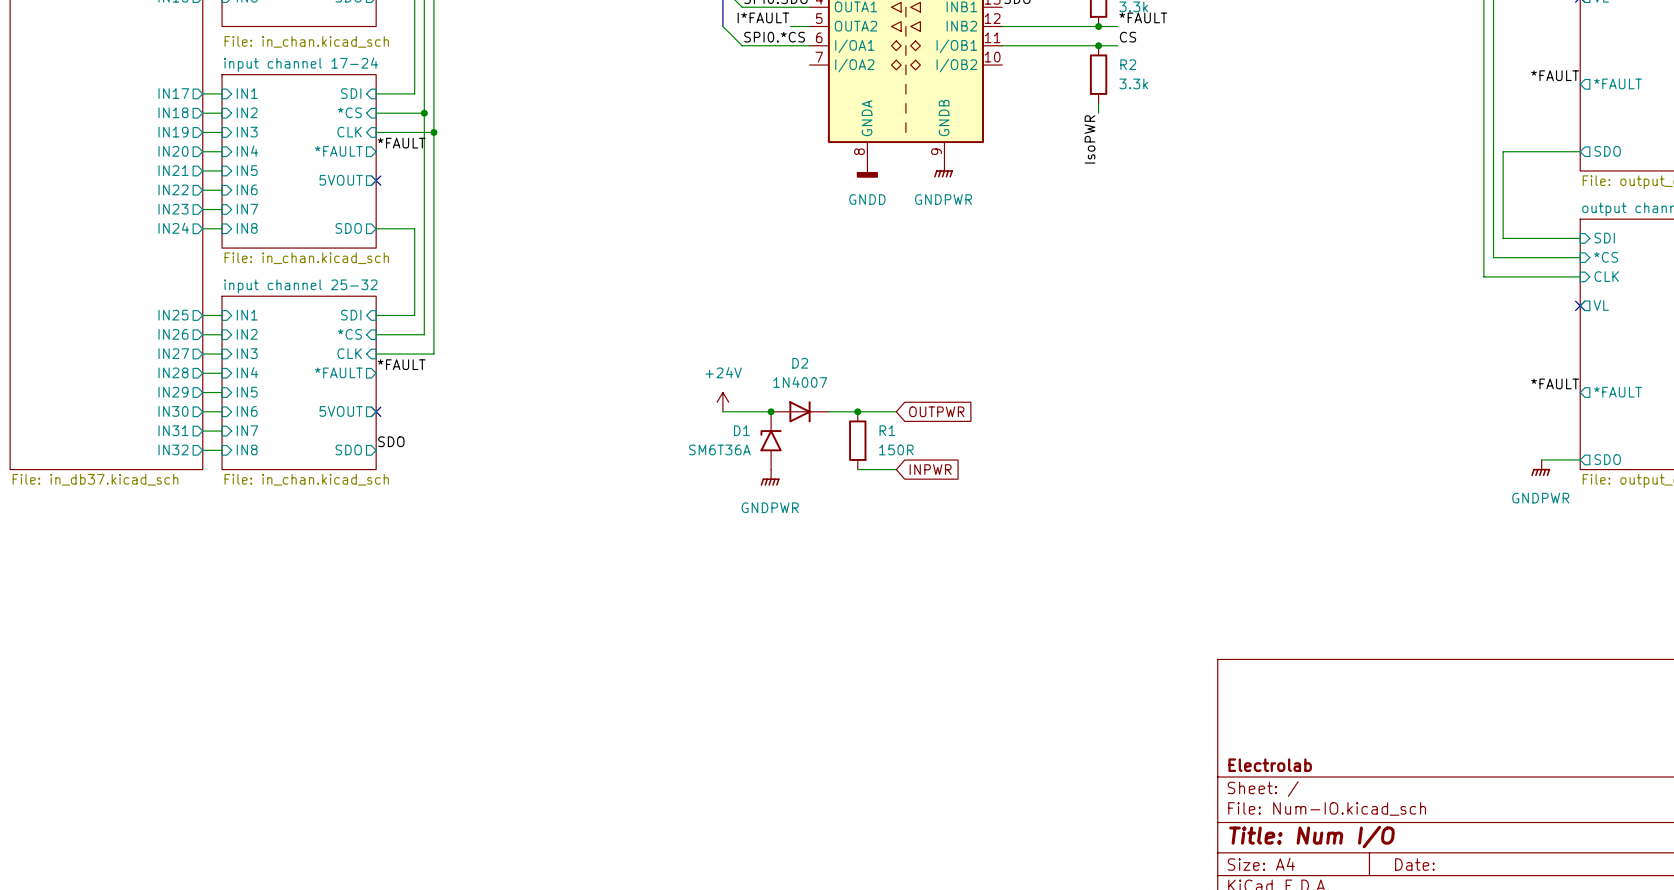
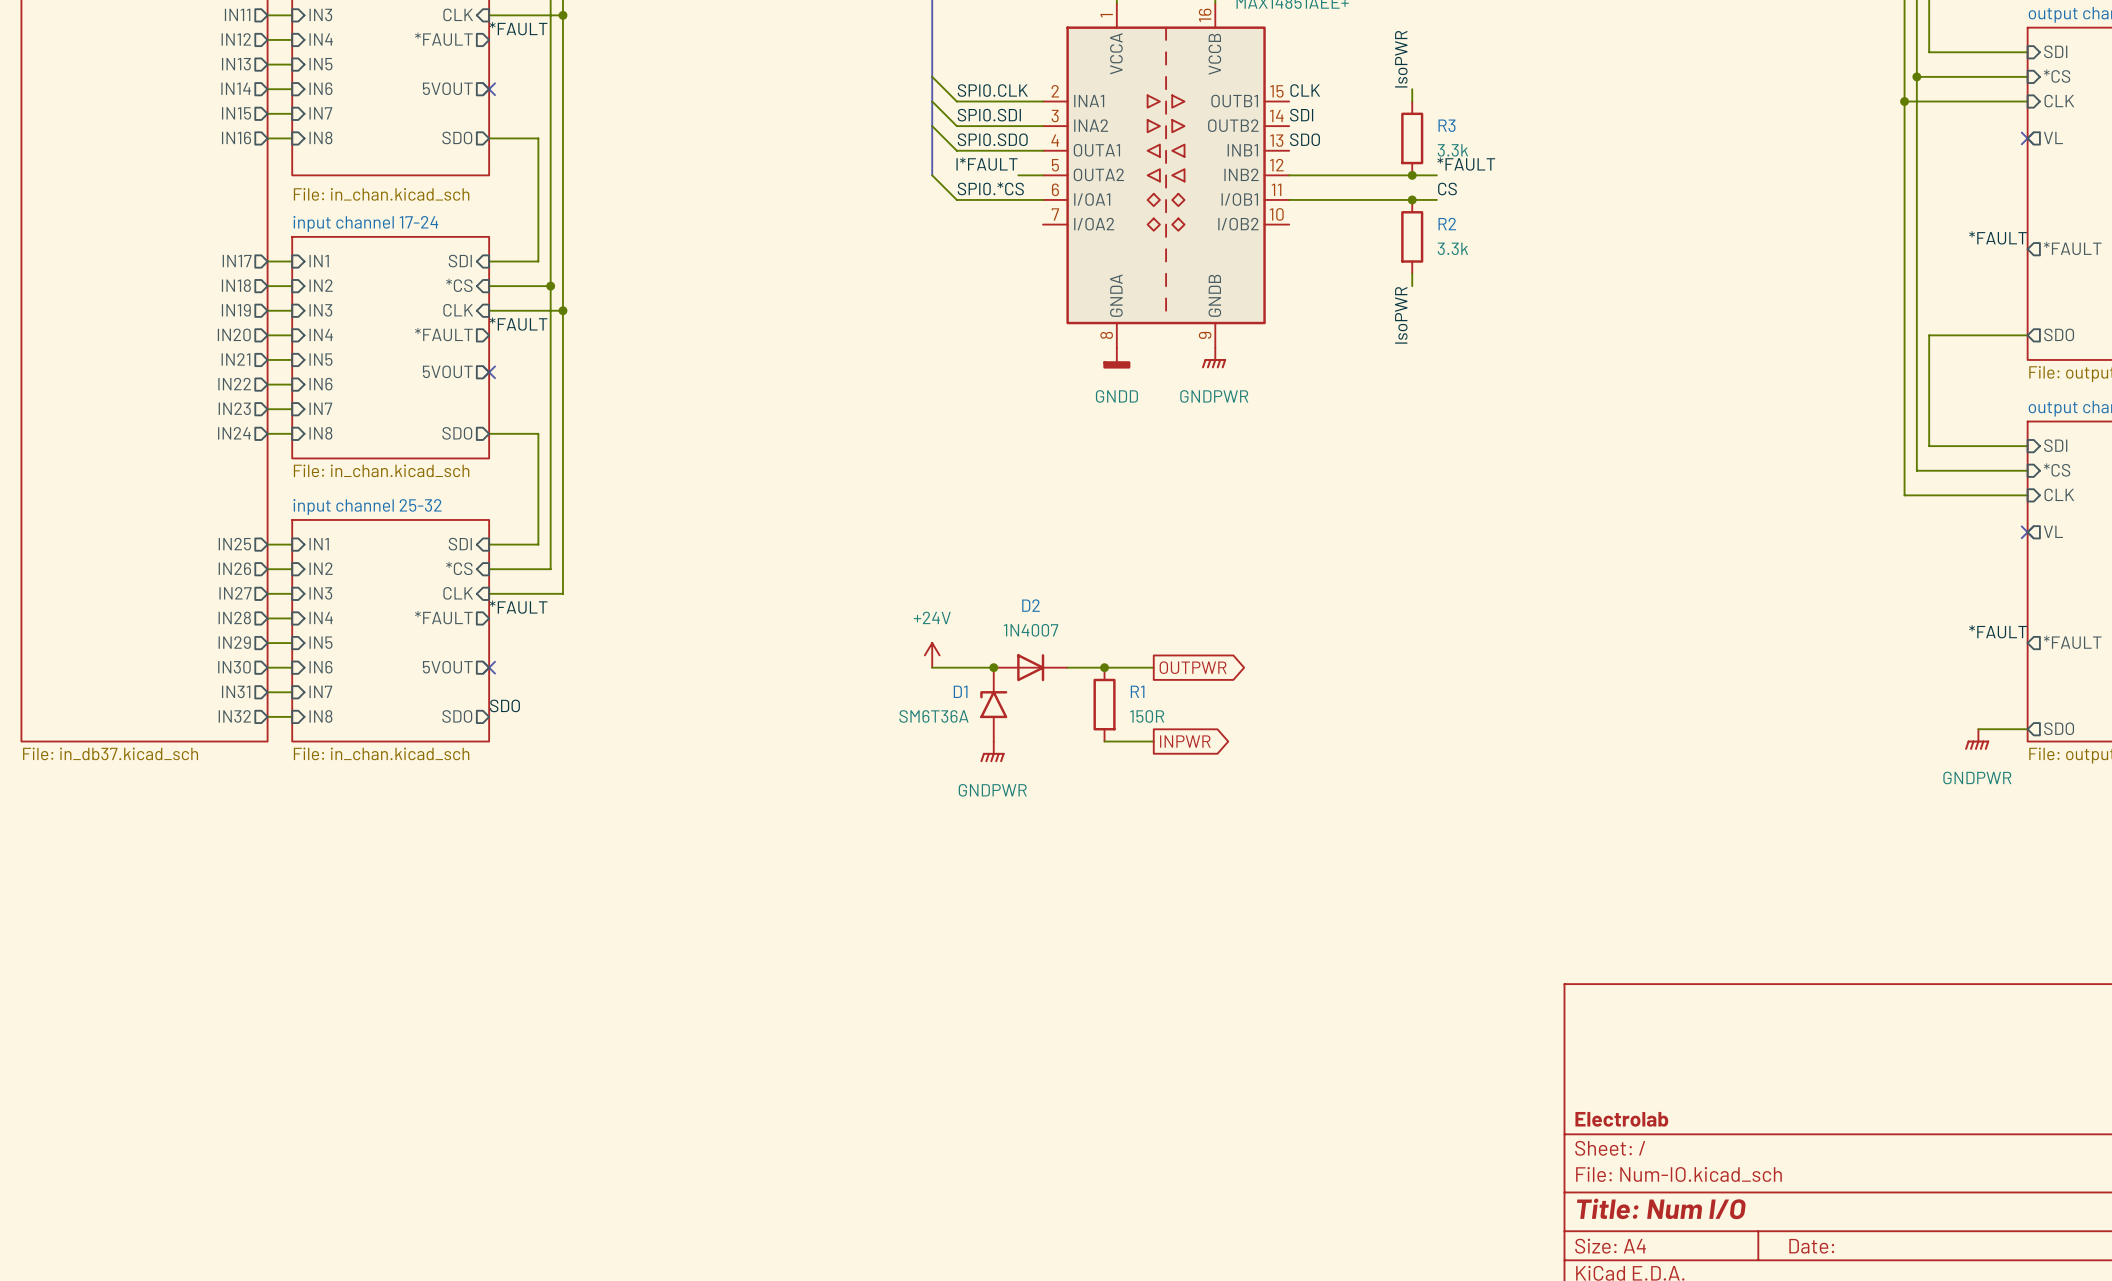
global label shape: input (936, 411) -> output (1193, 667)
global label shape: input (930, 469) -> output (1185, 741)

